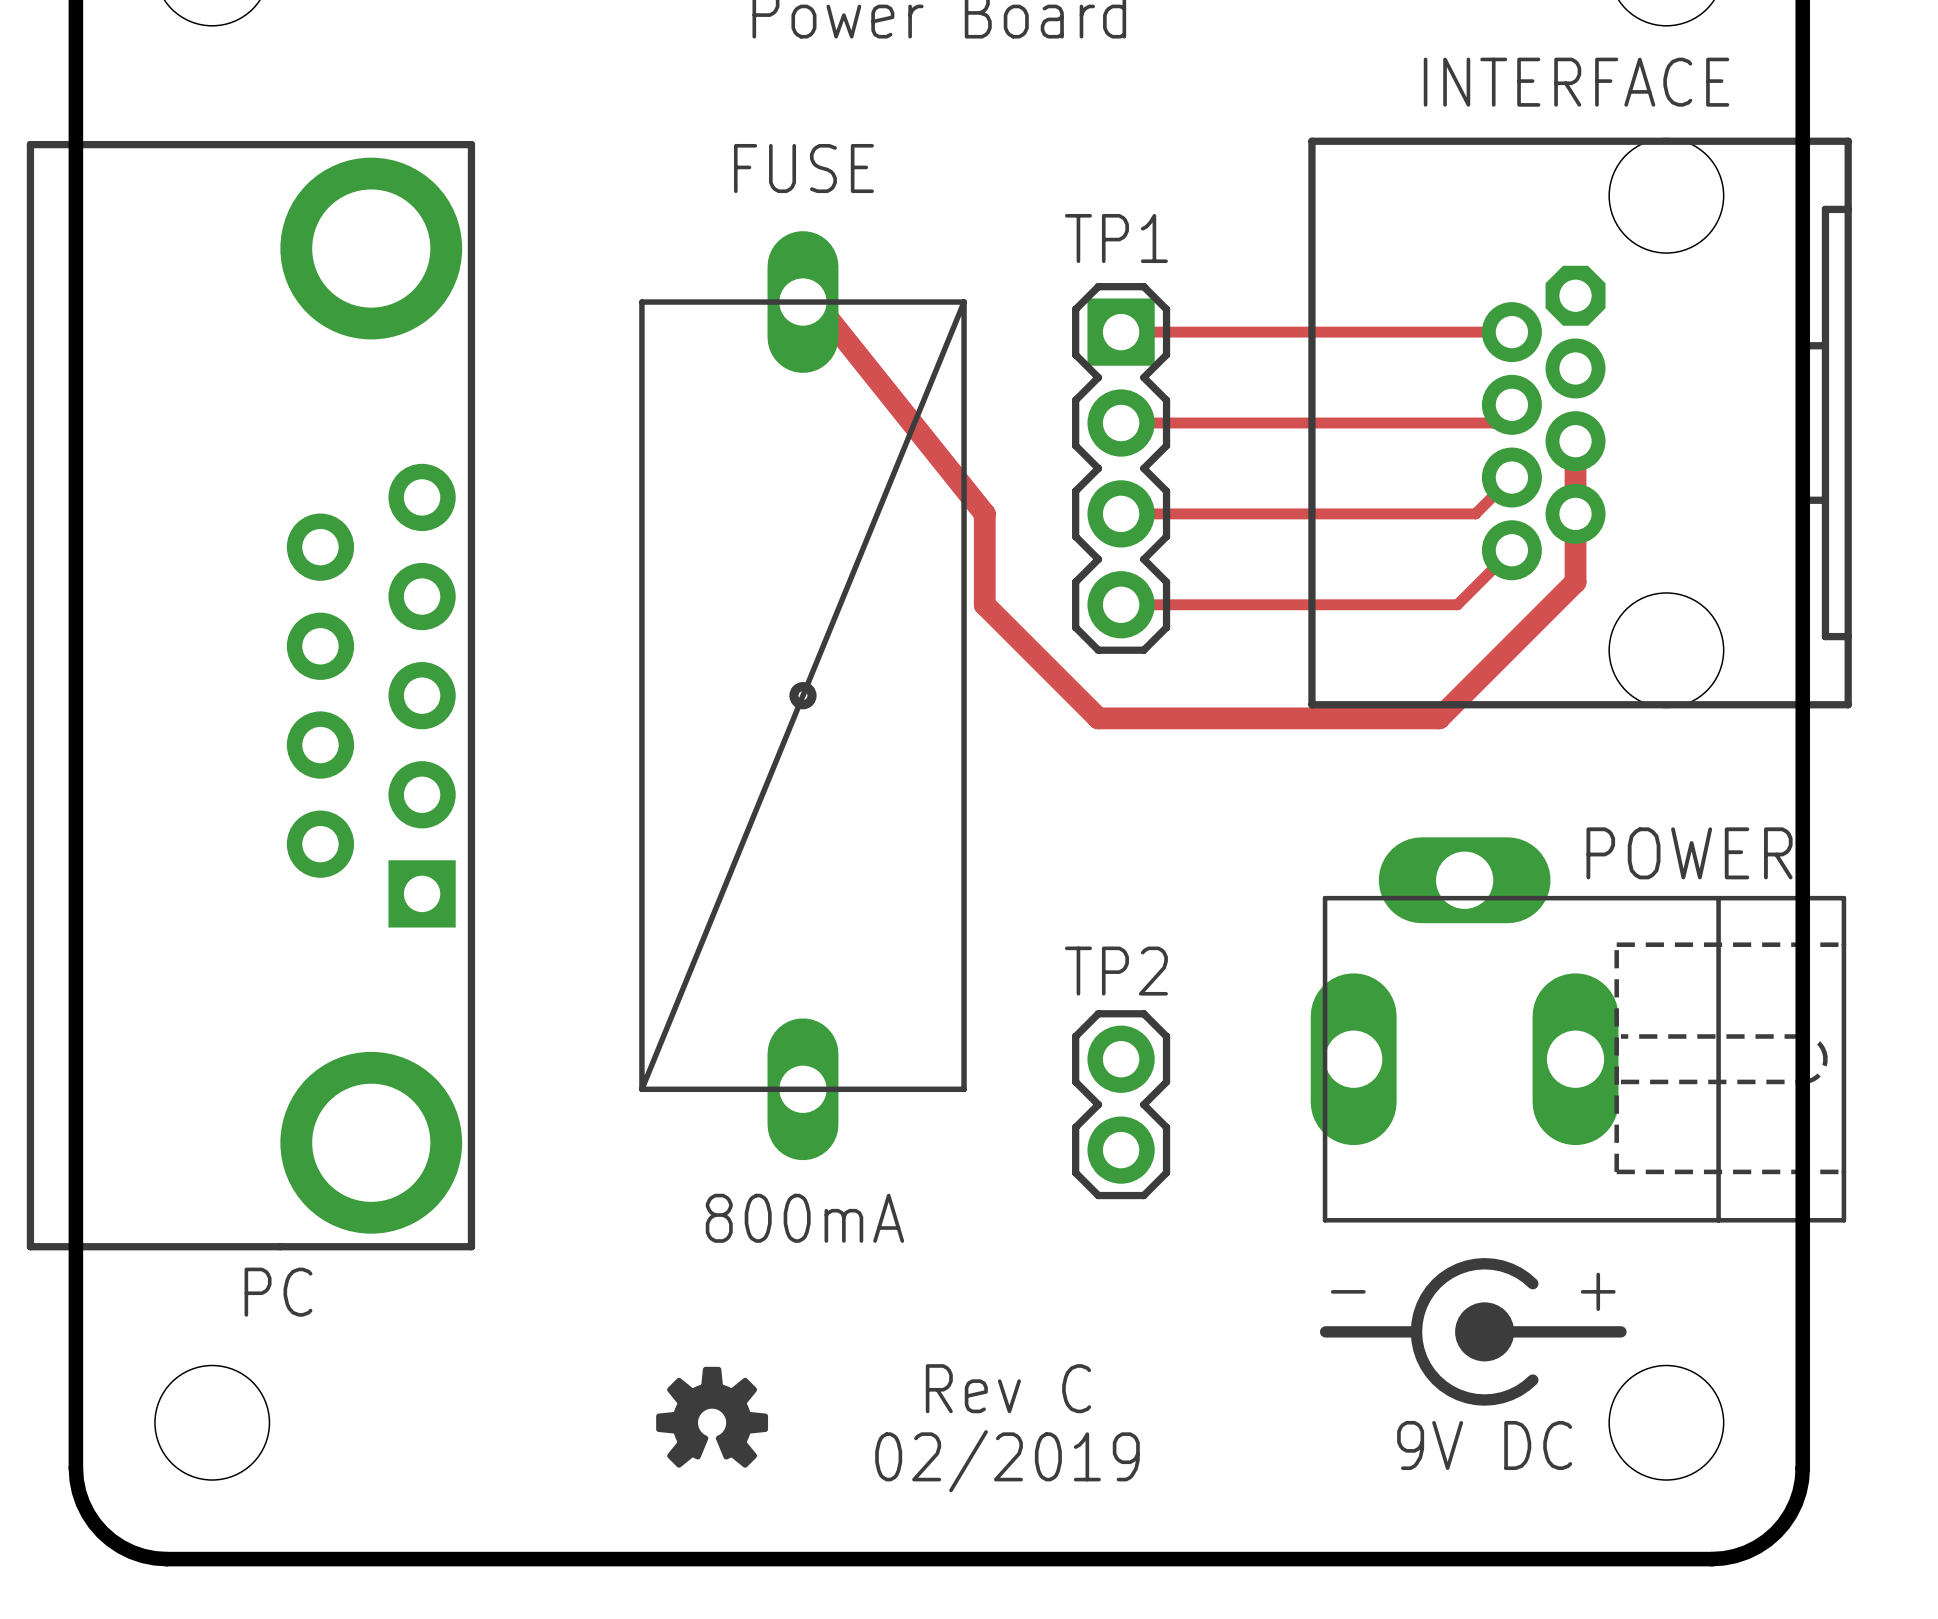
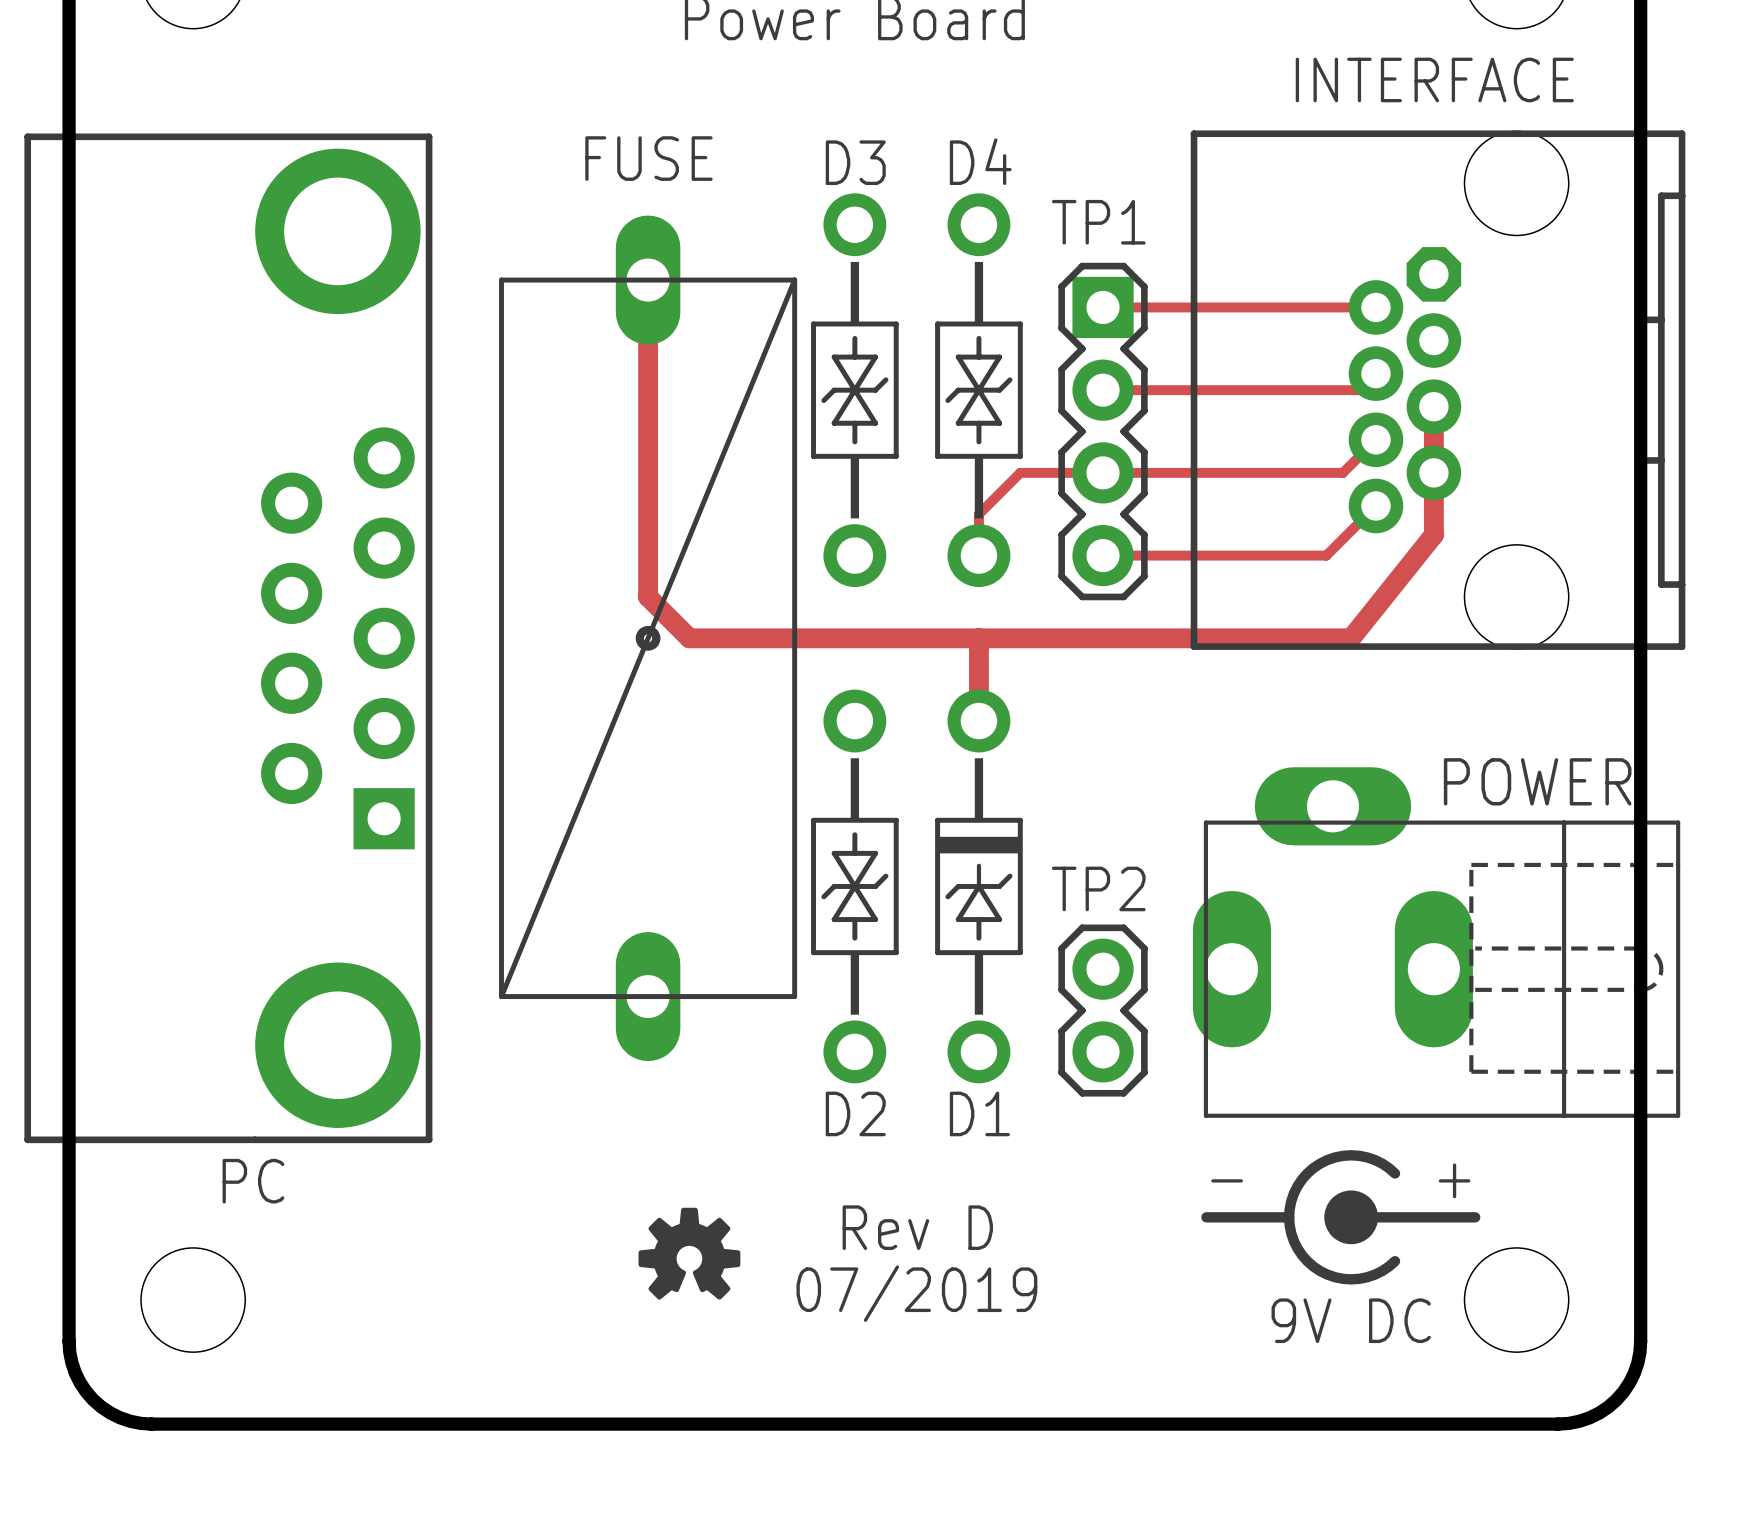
track: (802, 302) (802, 286) (984, 513) (984, 604) (1098, 718) (1439, 718) (1575, 582) -> (648, 280) (648, 596) (689, 638) (1351, 638) (1433, 534)
track: (1121, 332) (1211, 332) -> none
D3: none -> (854, 390)
D4: none -> (978, 390)
track: (1121, 423) (1211, 423) -> none
TP1 position: (1121, 468) -> (1103, 431)
track: none -> (1020, 472) (978, 514) (978, 555)
track: (1121, 604) (1211, 604) -> none
FUSE: none -> (648, 638)
FUSE: 800mA (802, 695) -> none
track: none -> (978, 638) (978, 721)
D2: none -> (854, 886)
D1: none -> (978, 886)
TP2 position: (1121, 1104) -> (1103, 1010)
text: Rev C (1008, 1388) -> Rev D (917, 1227)
drawing position: (712, 1417) -> (689, 1253)
text: 02/2019 (1007, 1461) -> 07/2019 (916, 1293)

